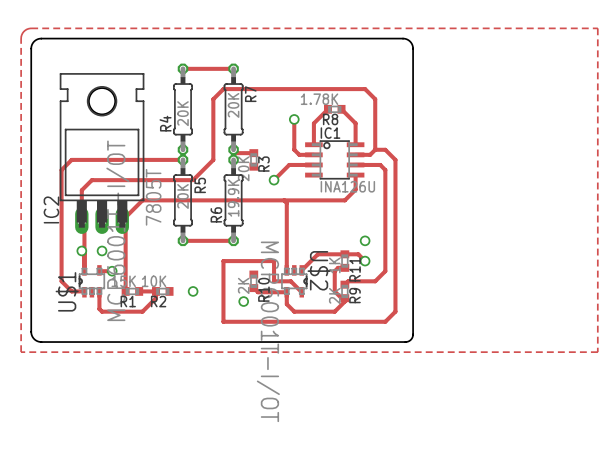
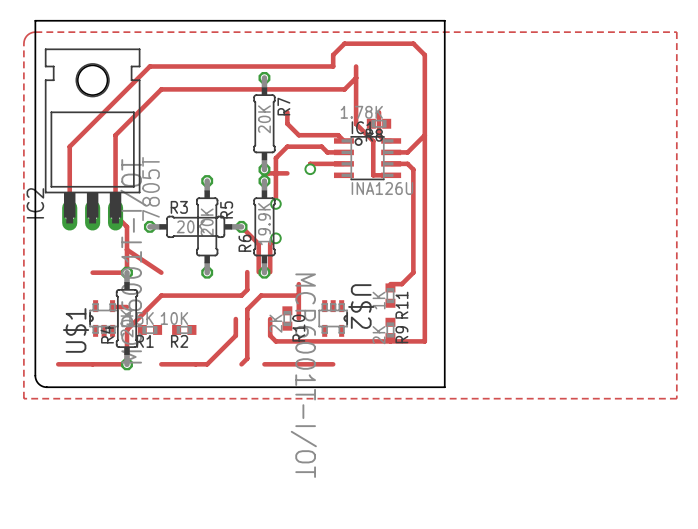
board edge: (31, 48) (34, 41) (41, 38) (403, 38) (409, 40) (413, 48) (413, 334) (408, 341) (392, 342) -> (35, 55) (35, 20) (444, 20) (444, 387)
track: none -> (356, 66) (356, 123) (373, 141) (373, 175) (391, 175)
track: (182, 68) (233, 68) -> none
track: none -> (356, 77) (344, 89) (161, 89) (115, 135) (115, 215) (127, 226) (127, 272) (92, 272)
track: none -> (287, 112) (287, 123) (298, 135) (338, 135) (343, 140)
track: none -> (379, 112) (379, 135) (384, 140) (391, 140)
track: (375, 99) (365, 89) (223, 89) (213, 99) (213, 159) (193, 180) (91, 180) (81, 190) (81, 220) (84, 223) (84, 270) -> (424, 112) (424, 55) (413, 43) (344, 43) (333, 55) (333, 66) (149, 66) (69, 146) (69, 192)
R4 position: (182, 109) -> (127, 318)
track: (327, 109) (313, 123) (313, 144) -> none
track: (341, 109) (355, 123) (355, 144) -> none
track: (294, 119) (294, 149) (299, 154) (313, 154) -> none
via: (294, 119) -> none
track: none -> (424, 135) (407, 152) (391, 152)
track: none -> (343, 152) (327, 152) (321, 146) (287, 146) (275, 158) (275, 203)
track: none -> (343, 163) (310, 163) (310, 169)
track: none -> (391, 163) (407, 163) (413, 169) (413, 272) (401, 284) (390, 284)
track: (182, 149) (182, 159) (71, 159) (61, 170) -> none
R3 footprint: [249, 149, 259, 171] -> [143, 215, 248, 238]
via: none -> (310, 169)
track: none -> (424, 169) (424, 341) (275, 341) (270, 335) (270, 319)
IC2 position: (102, 153) -> (92, 139)
track: (355, 154) (370, 154) (375, 149) (385, 149) (395, 159) (395, 311) (385, 321) (294, 321) -> none
IC1 position: (334, 159) -> (367, 158)
R3 name position: R3 (263, 164) -> R3 (179, 207)
track: (313, 164) (289, 164) (274, 180) -> none
track: (355, 164) (380, 164) (385, 170) (385, 271) (375, 281) (348, 281) (344, 284) -> none
track: (355, 175) (355, 189) (344, 200) (142, 200) (122, 220) (125, 223) (125, 291) -> none
via: none -> (275, 203)
via: (274, 180) -> none
track: (61, 190) (61, 281) (71, 291) (84, 292) -> none
track: none -> (241, 226) (258, 244) (258, 272)
track: (284, 200) (286, 203) (286, 270) -> none
track: none -> (275, 238) (270, 244) (270, 272)
via: none -> (275, 238)
track: none -> (127, 249) (161, 272)
track: (182, 240) (233, 240) -> none
track: none -> (247, 272) (247, 289) (241, 295) (161, 295) (127, 329) (127, 364) (58, 364)
via: (365, 240) -> none
via: (81, 250) -> none
via: (102, 250) -> none
track: none -> (298, 284) (298, 318)
track: (230, 261) (223, 261) (223, 321) (233, 321) -> (261, 295) (247, 309) (247, 358) (241, 364)
track: (263, 261) (274, 261) (274, 281) (290, 281) (301, 292) -> none
track: (365, 261) (358, 254) (317, 254) (301, 270) -> none
via: (365, 261) -> none
track: (344, 267) (338, 267) (334, 271) (334, 291) (344, 301) (334, 311) (294, 311) (286, 304) (286, 292) (257, 292) (253, 288) -> none
via: (112, 271) -> none
track: none -> (235, 319) (235, 335) (207, 364) (161, 364)
track: (139, 291) (155, 291) (155, 298) (142, 311) (102, 311) (99, 309) (99, 292) -> none
via: (193, 291) -> none
via: (243, 301) -> none

